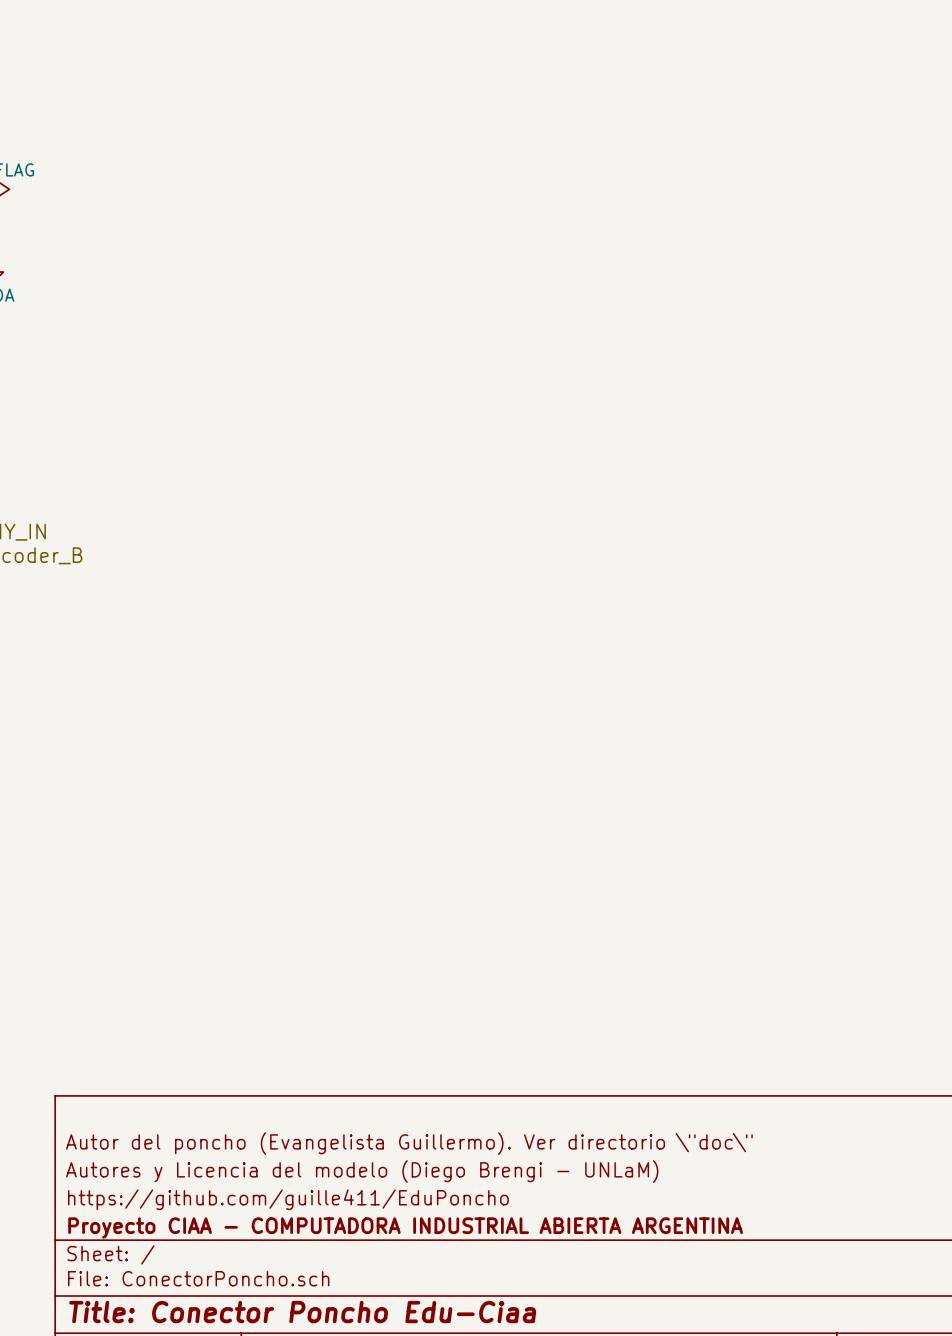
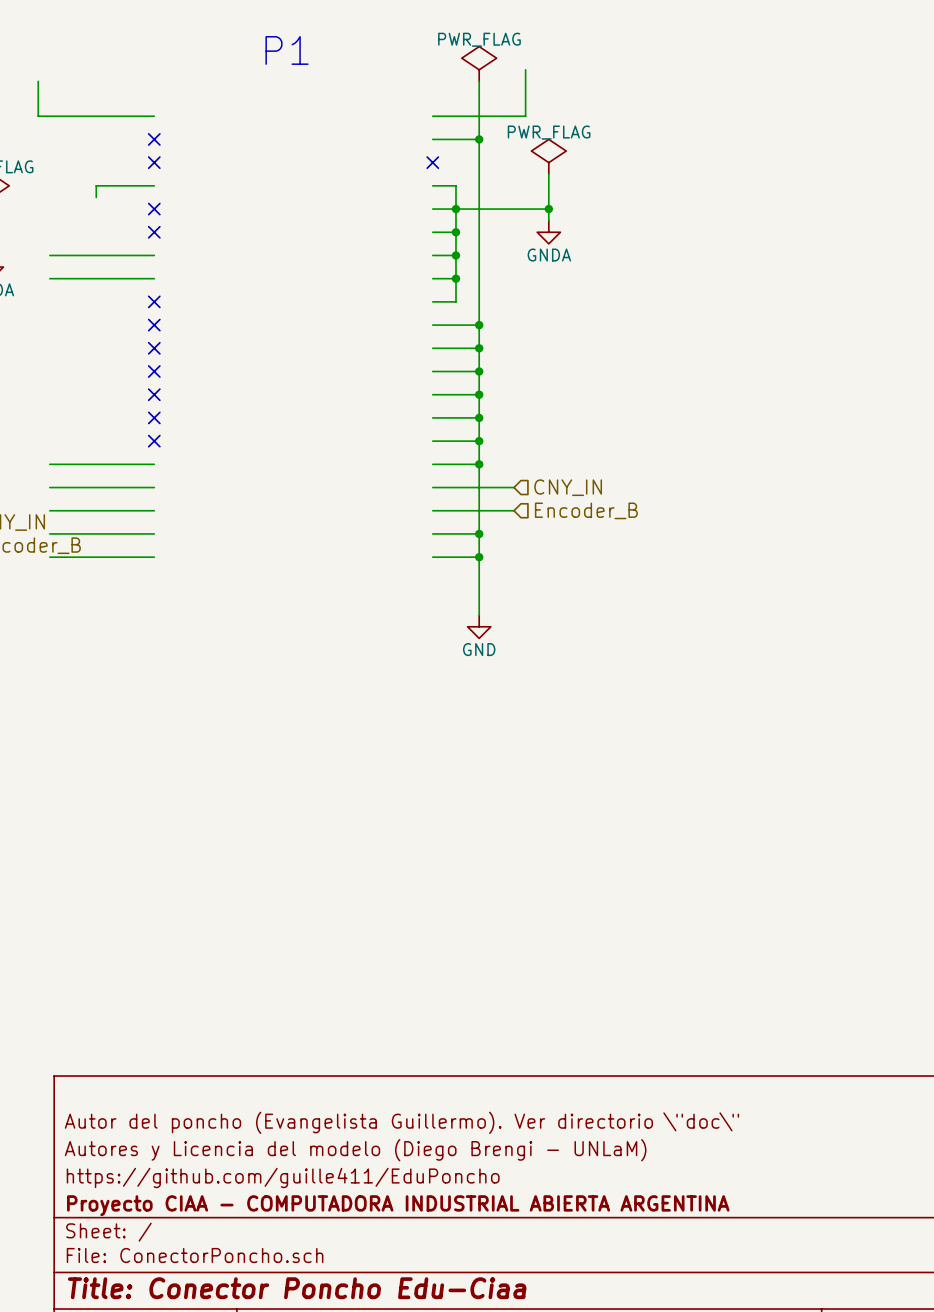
text: none -> P1 (287, 50)
power symbol: none -> PWR_FLAG (479, 64)
wire: none -> (525, 69) (525, 116) (432, 116)
wire: none -> (38, 81) (38, 116) (154, 116)
wire: none -> (479, 81) (479, 615)
no-connect mark: none -> (154, 139)
wire: none -> (432, 139) (479, 139)
junction: none -> (479, 139)
power symbol: none -> PWR_FLAG (548, 156)
no-connect mark: none -> (154, 162)
no-connect mark: none -> (432, 162)
wire: none -> (548, 174) (548, 220)
wire: none -> (154, 185) (96, 185) (96, 197)
wire: none -> (432, 185) (455, 185) (455, 301) (432, 301)
no-connect mark: none -> (154, 209)
wire: none -> (432, 209) (548, 209)
junction: none -> (455, 209)
junction: none -> (548, 209)
no-connect mark: none -> (154, 232)
wire: none -> (432, 232) (455, 232)
junction: none -> (455, 232)
power symbol: none -> GNDA (548, 232)
wire: none -> (49, 255) (154, 255)
wire: none -> (432, 255) (455, 255)
junction: none -> (455, 255)
wire: none -> (49, 278) (154, 278)
wire: none -> (432, 278) (455, 278)
junction: none -> (455, 278)
no-connect mark: none -> (154, 301)
no-connect mark: none -> (154, 325)
wire: none -> (432, 325) (479, 325)
junction: none -> (479, 325)
no-connect mark: none -> (154, 348)
wire: none -> (432, 348) (479, 348)
junction: none -> (479, 348)
no-connect mark: none -> (154, 371)
wire: none -> (432, 371) (479, 371)
junction: none -> (479, 371)
no-connect mark: none -> (154, 394)
wire: none -> (432, 394) (479, 394)
junction: none -> (479, 394)
no-connect mark: none -> (154, 417)
wire: none -> (432, 417) (479, 417)
junction: none -> (479, 417)
no-connect mark: none -> (154, 441)
wire: none -> (432, 441) (479, 441)
junction: none -> (479, 441)
wire: none -> (49, 464) (154, 464)
wire: none -> (432, 464) (479, 464)
junction: none -> (479, 464)
wire: none -> (49, 487) (154, 487)
wire: none -> (432, 487) (514, 487)
hierarchical label: none -> CNY_IN (568, 487)
wire: none -> (49, 510) (154, 510)
wire: none -> (432, 510) (514, 510)
hierarchical label: none -> Encoder_B (586, 510)
wire: none -> (49, 533) (154, 533)
wire: none -> (432, 533) (479, 533)
junction: none -> (479, 533)
wire: none -> (49, 557) (154, 557)
wire: none -> (432, 557) (479, 557)
junction: none -> (479, 557)
power symbol: none -> GND (479, 626)

